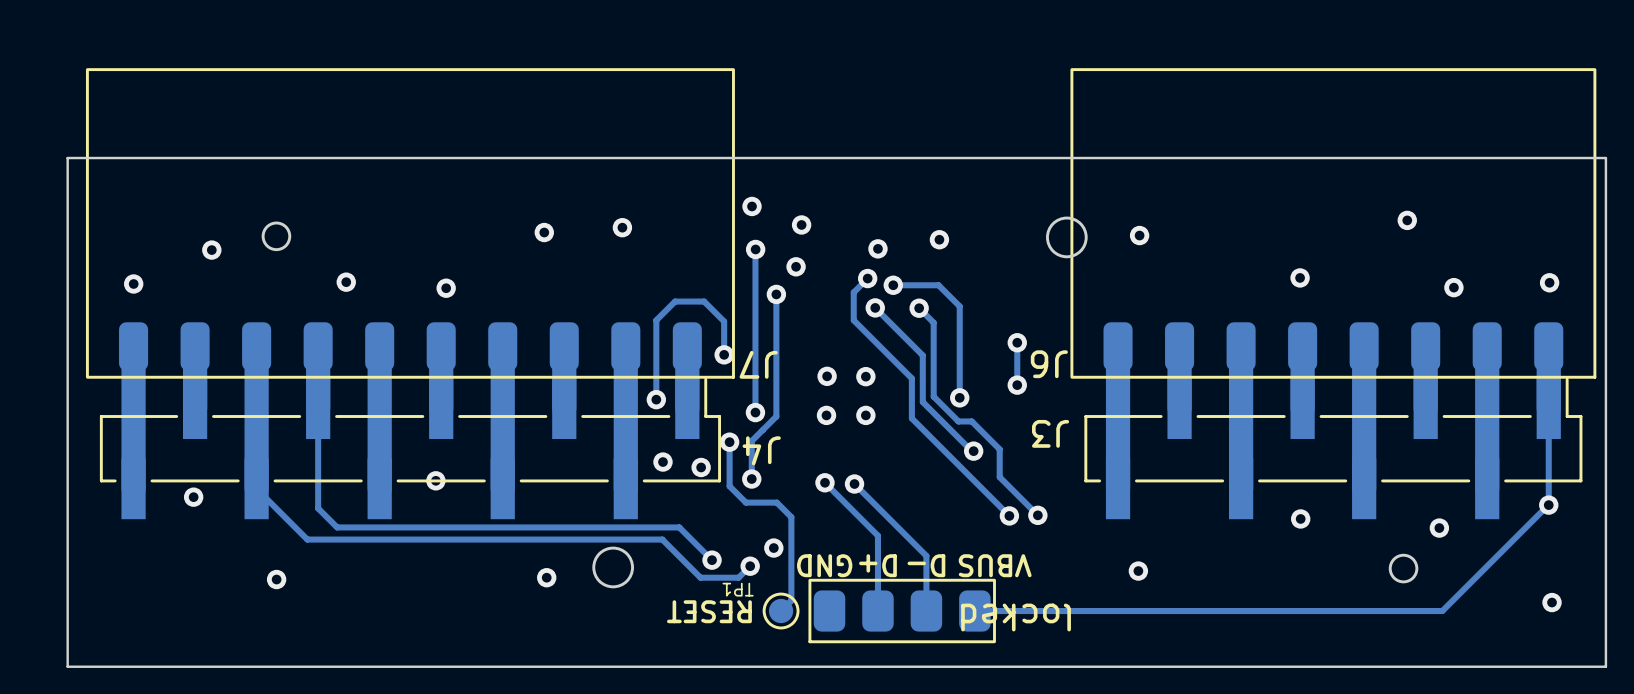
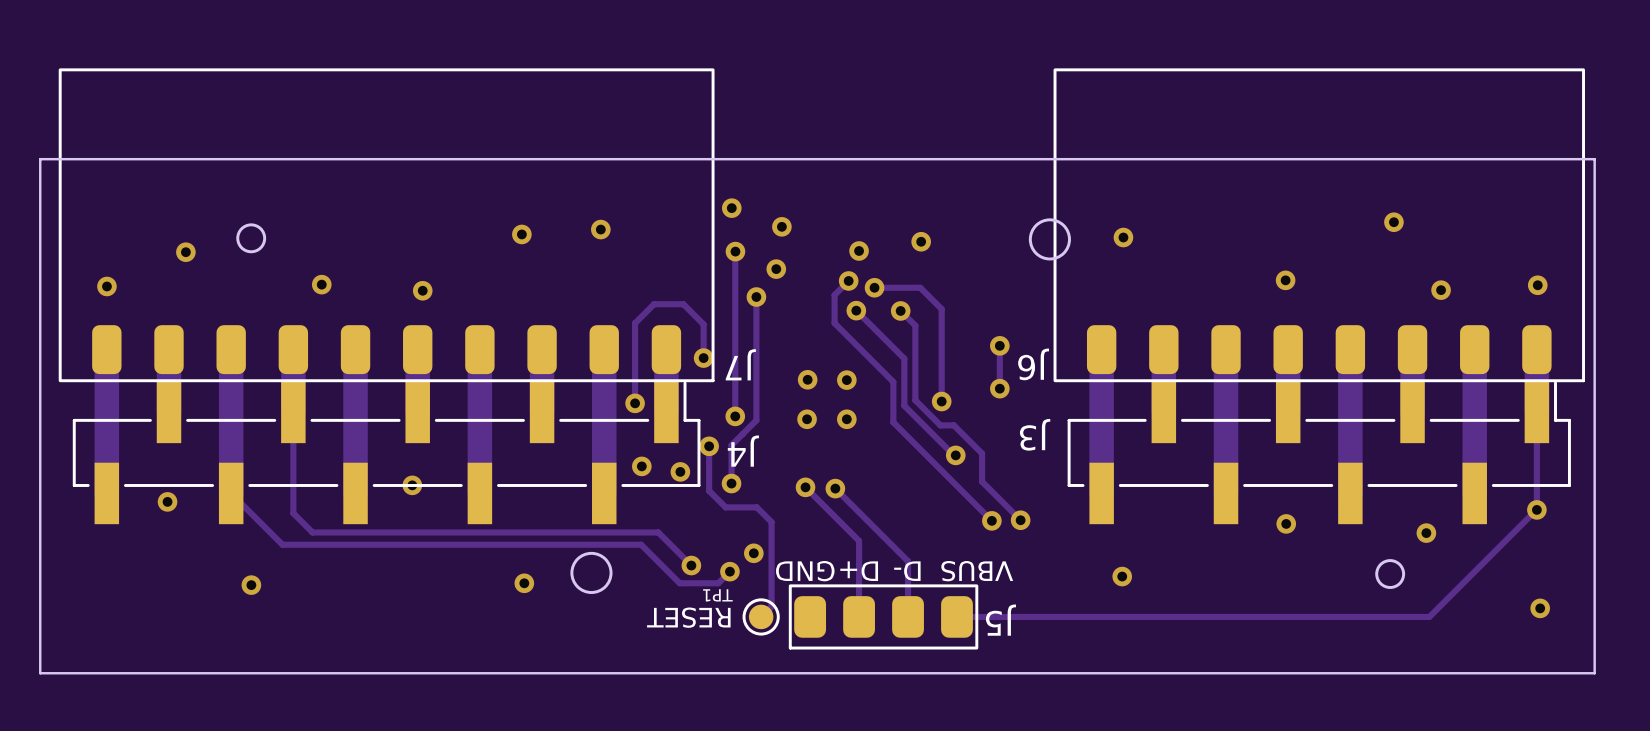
locked name: locked (1016, 617) -> J5 (1000, 620)

